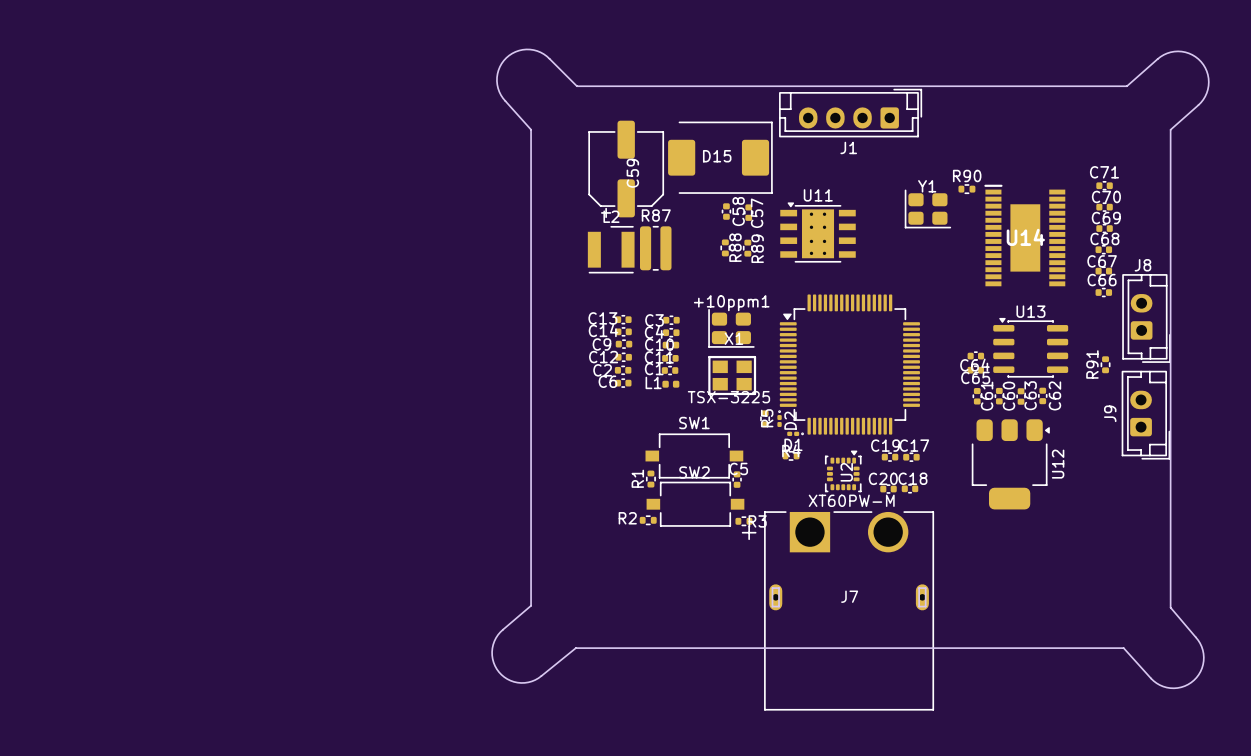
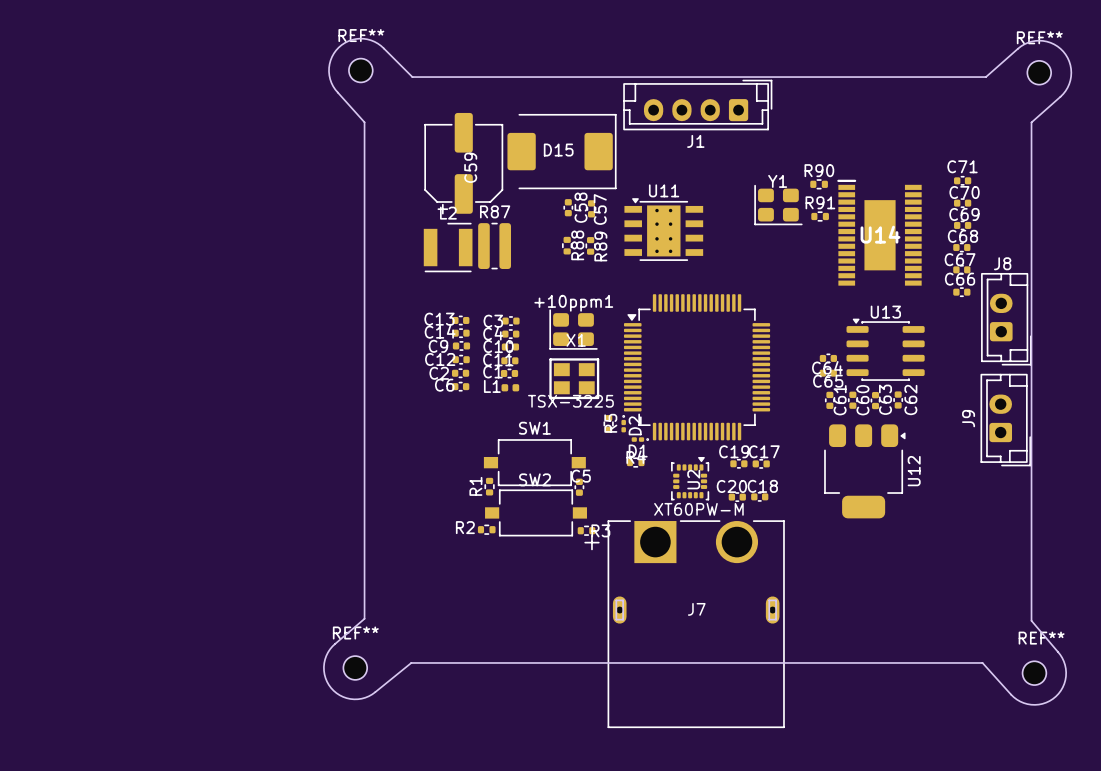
REF**: none -> (360, 70)
REF**: none -> (1039, 72)
R91 rotation: 0° (1105, 364) -> 90° clockwise (820, 216)
R91 position: (1105, 364) -> (820, 216)
REF**: none -> (355, 667)
REF**: none -> (1034, 673)

